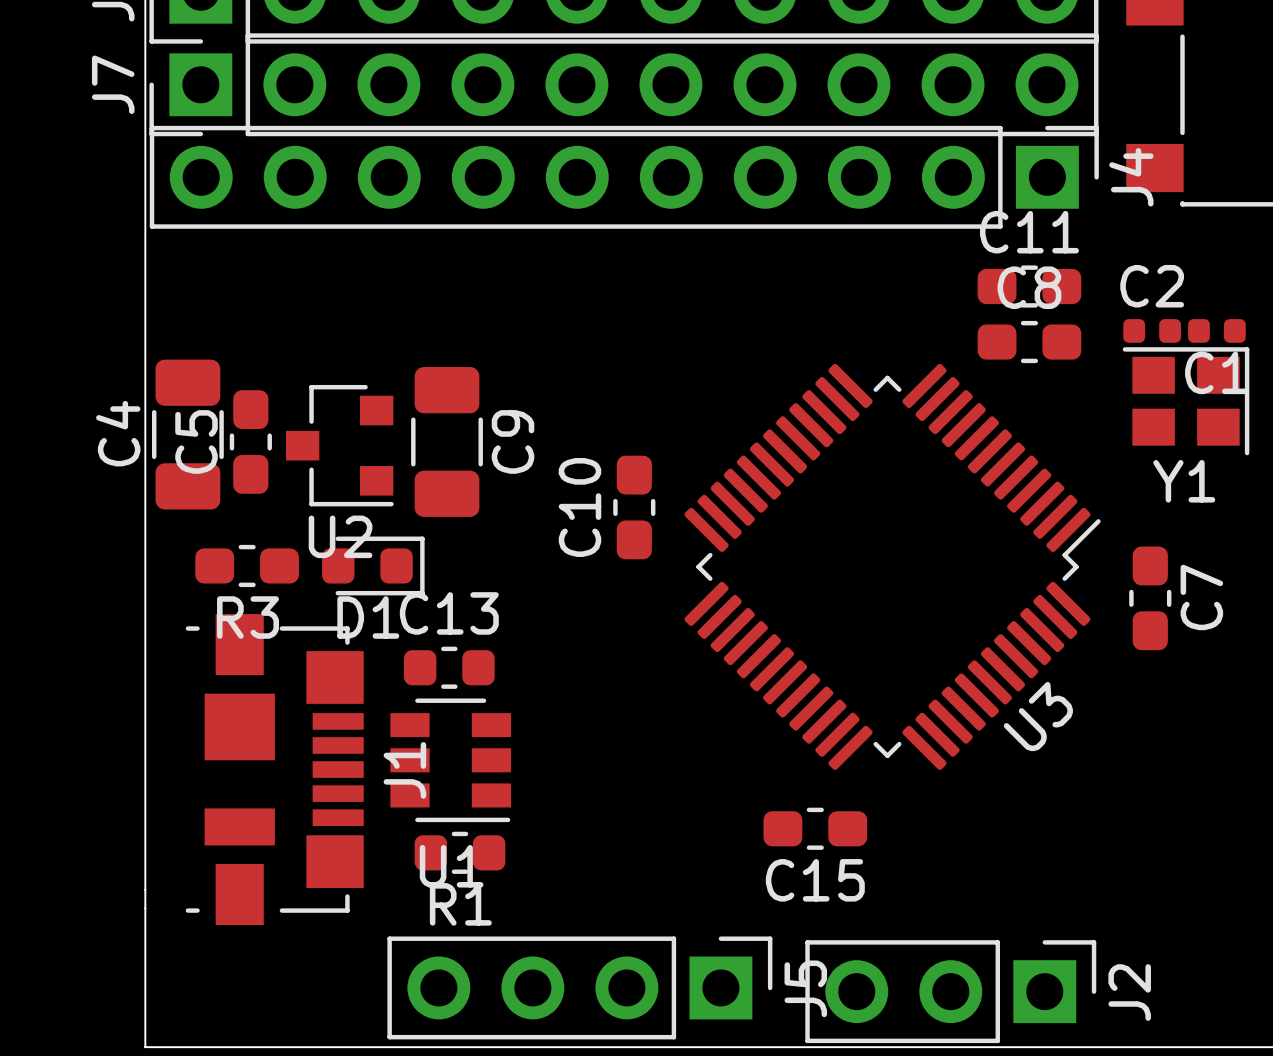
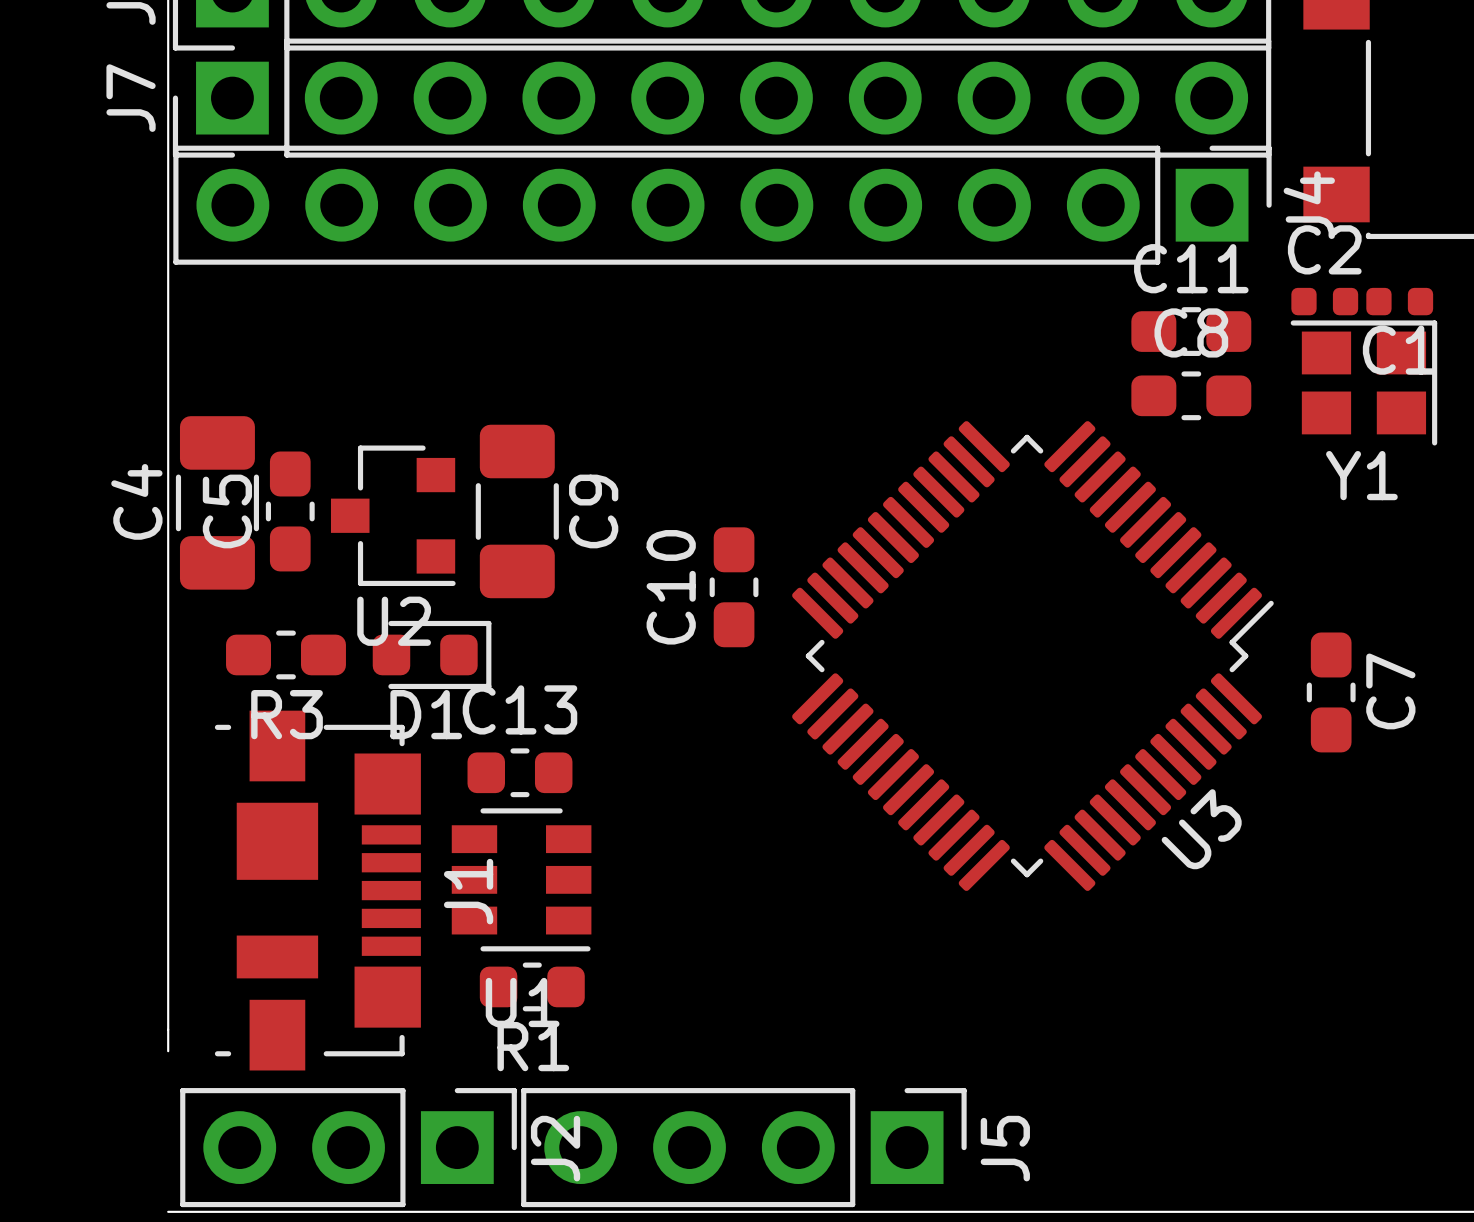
C2 position: (1152, 330) -> (1324, 301)
C1 position: (1216, 330) -> (1399, 301)
Y1 position: (1186, 401) -> (1363, 382)
C15: (815, 828) -> none
board edge: (145, 908) (145, 1047) -> none
J5 position: (579, 987) -> (743, 1147)
J2 position: (950, 991) -> (348, 1147)

